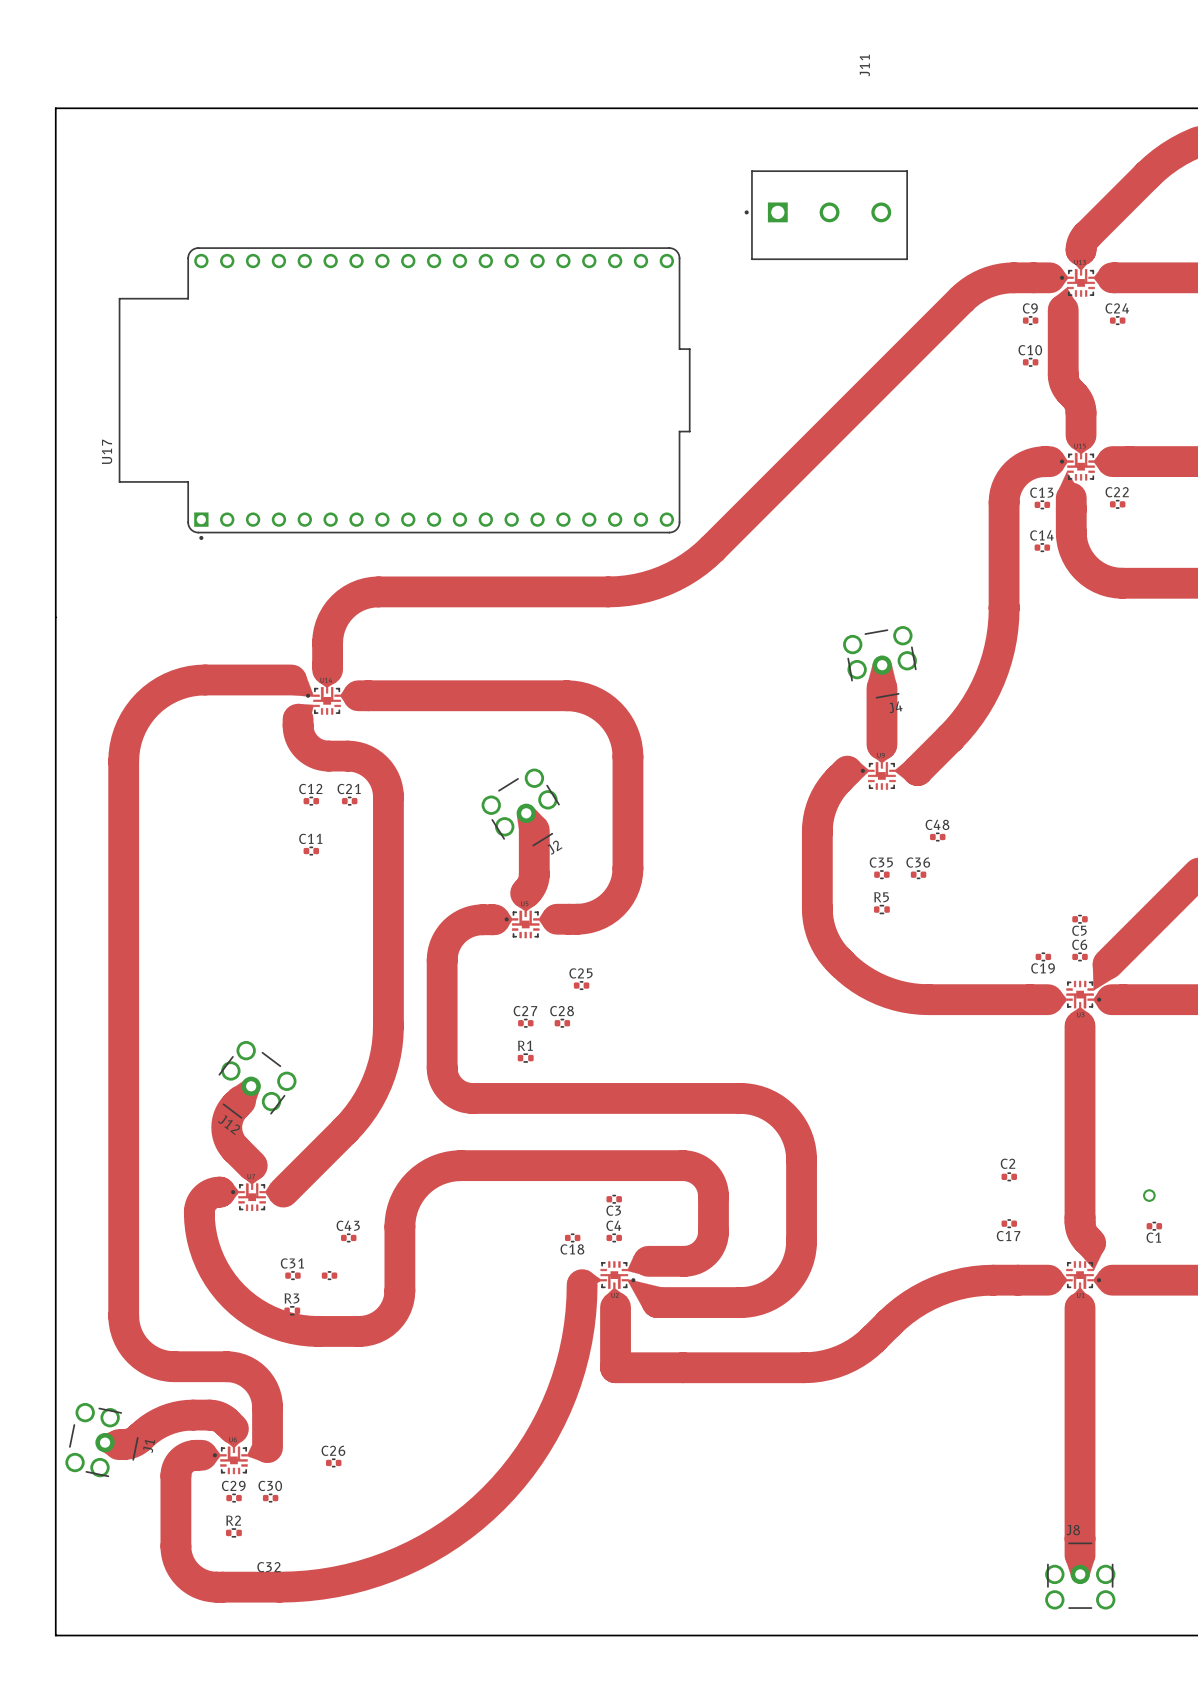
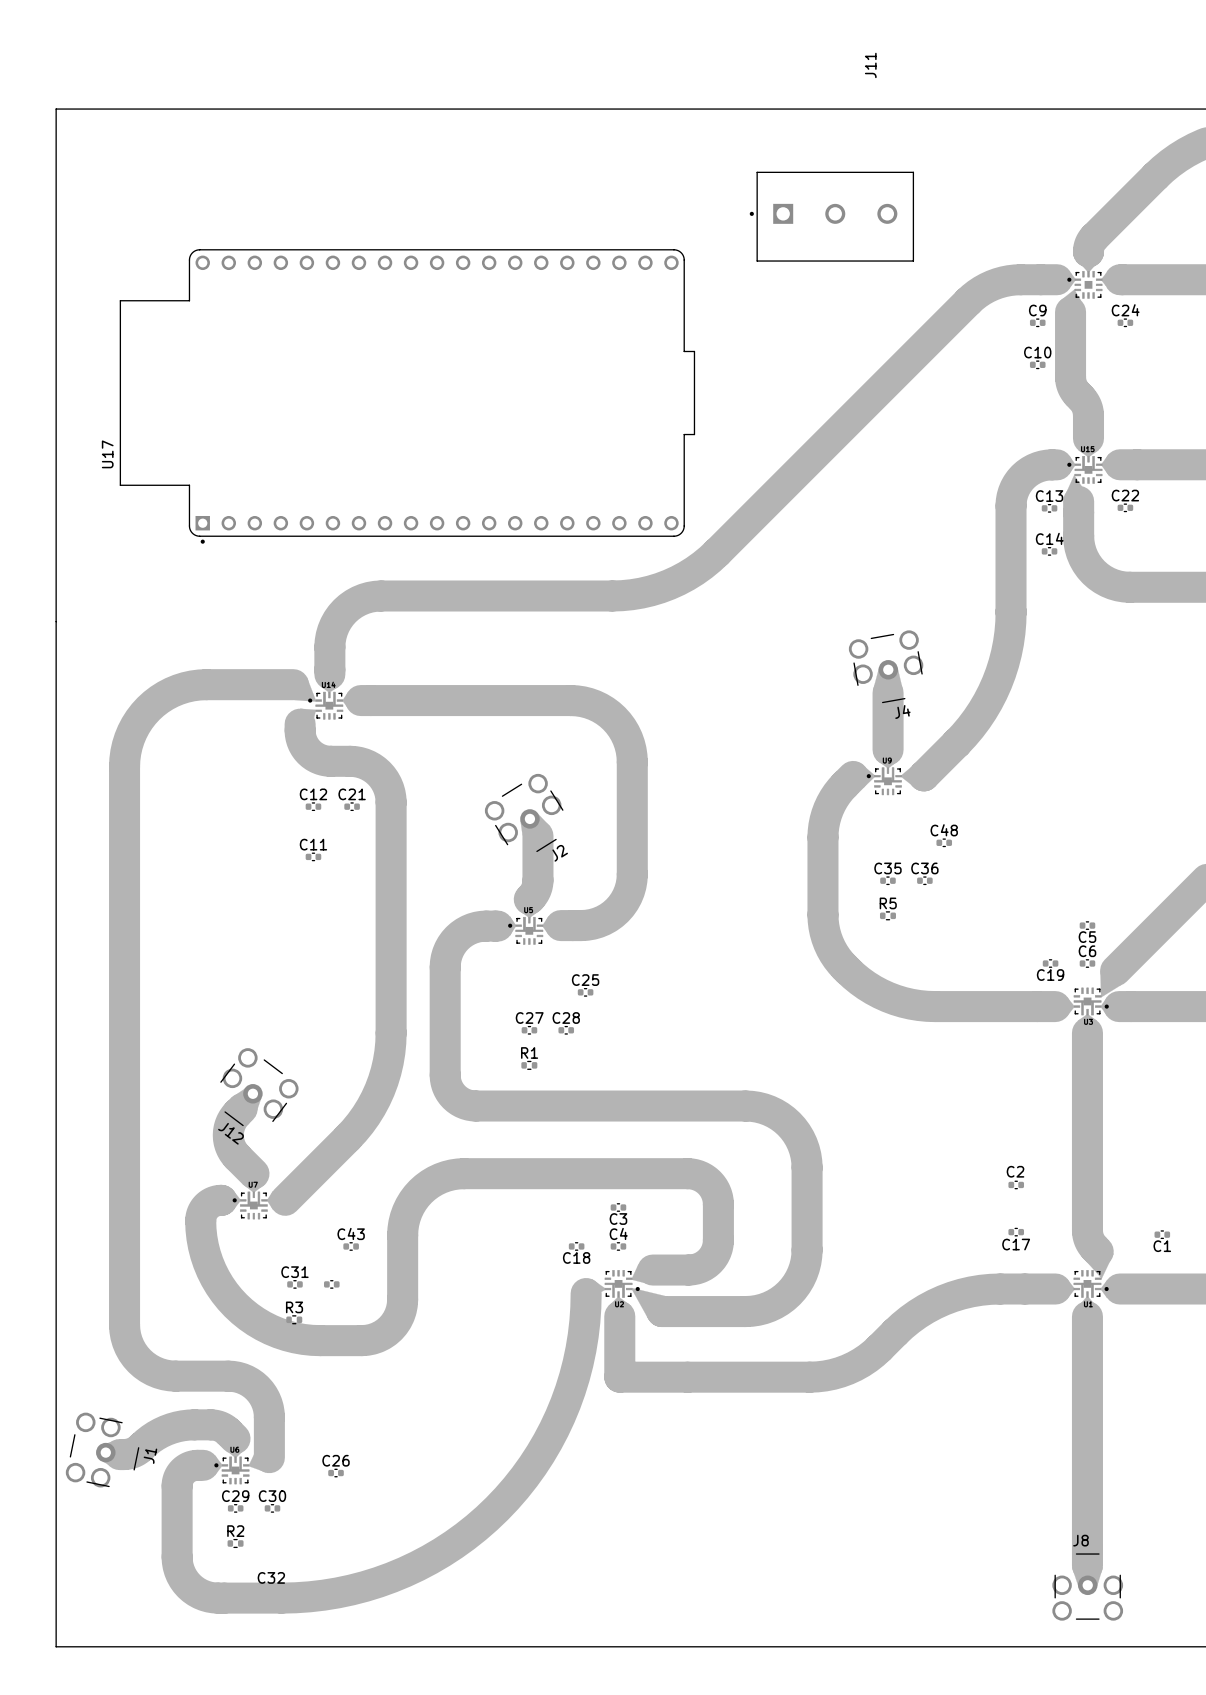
part: (1077, 282) -> none
part: none -> (1084, 284)
via: (1149, 1195) -> none

